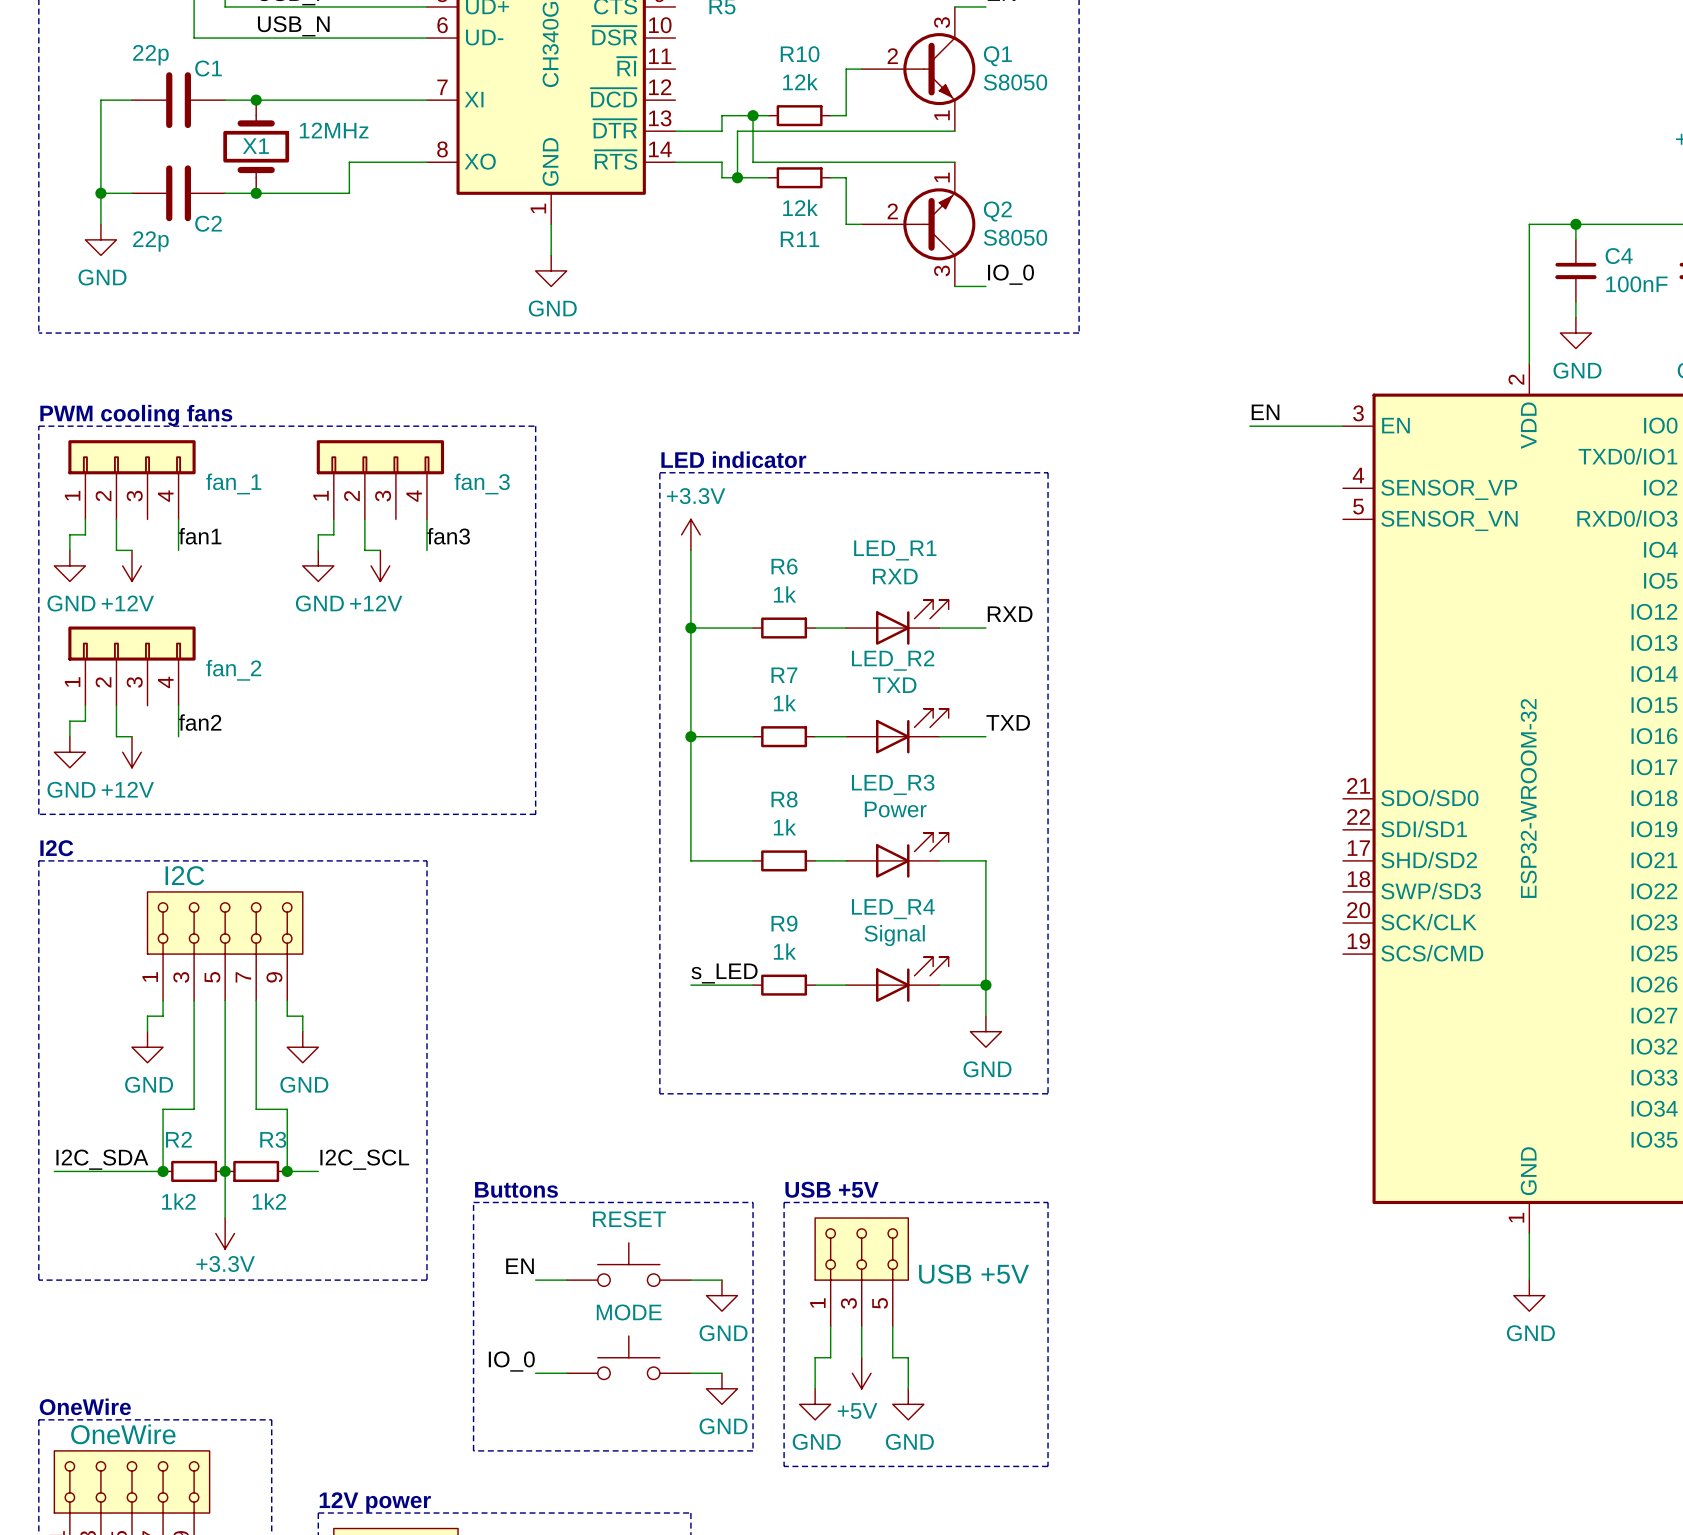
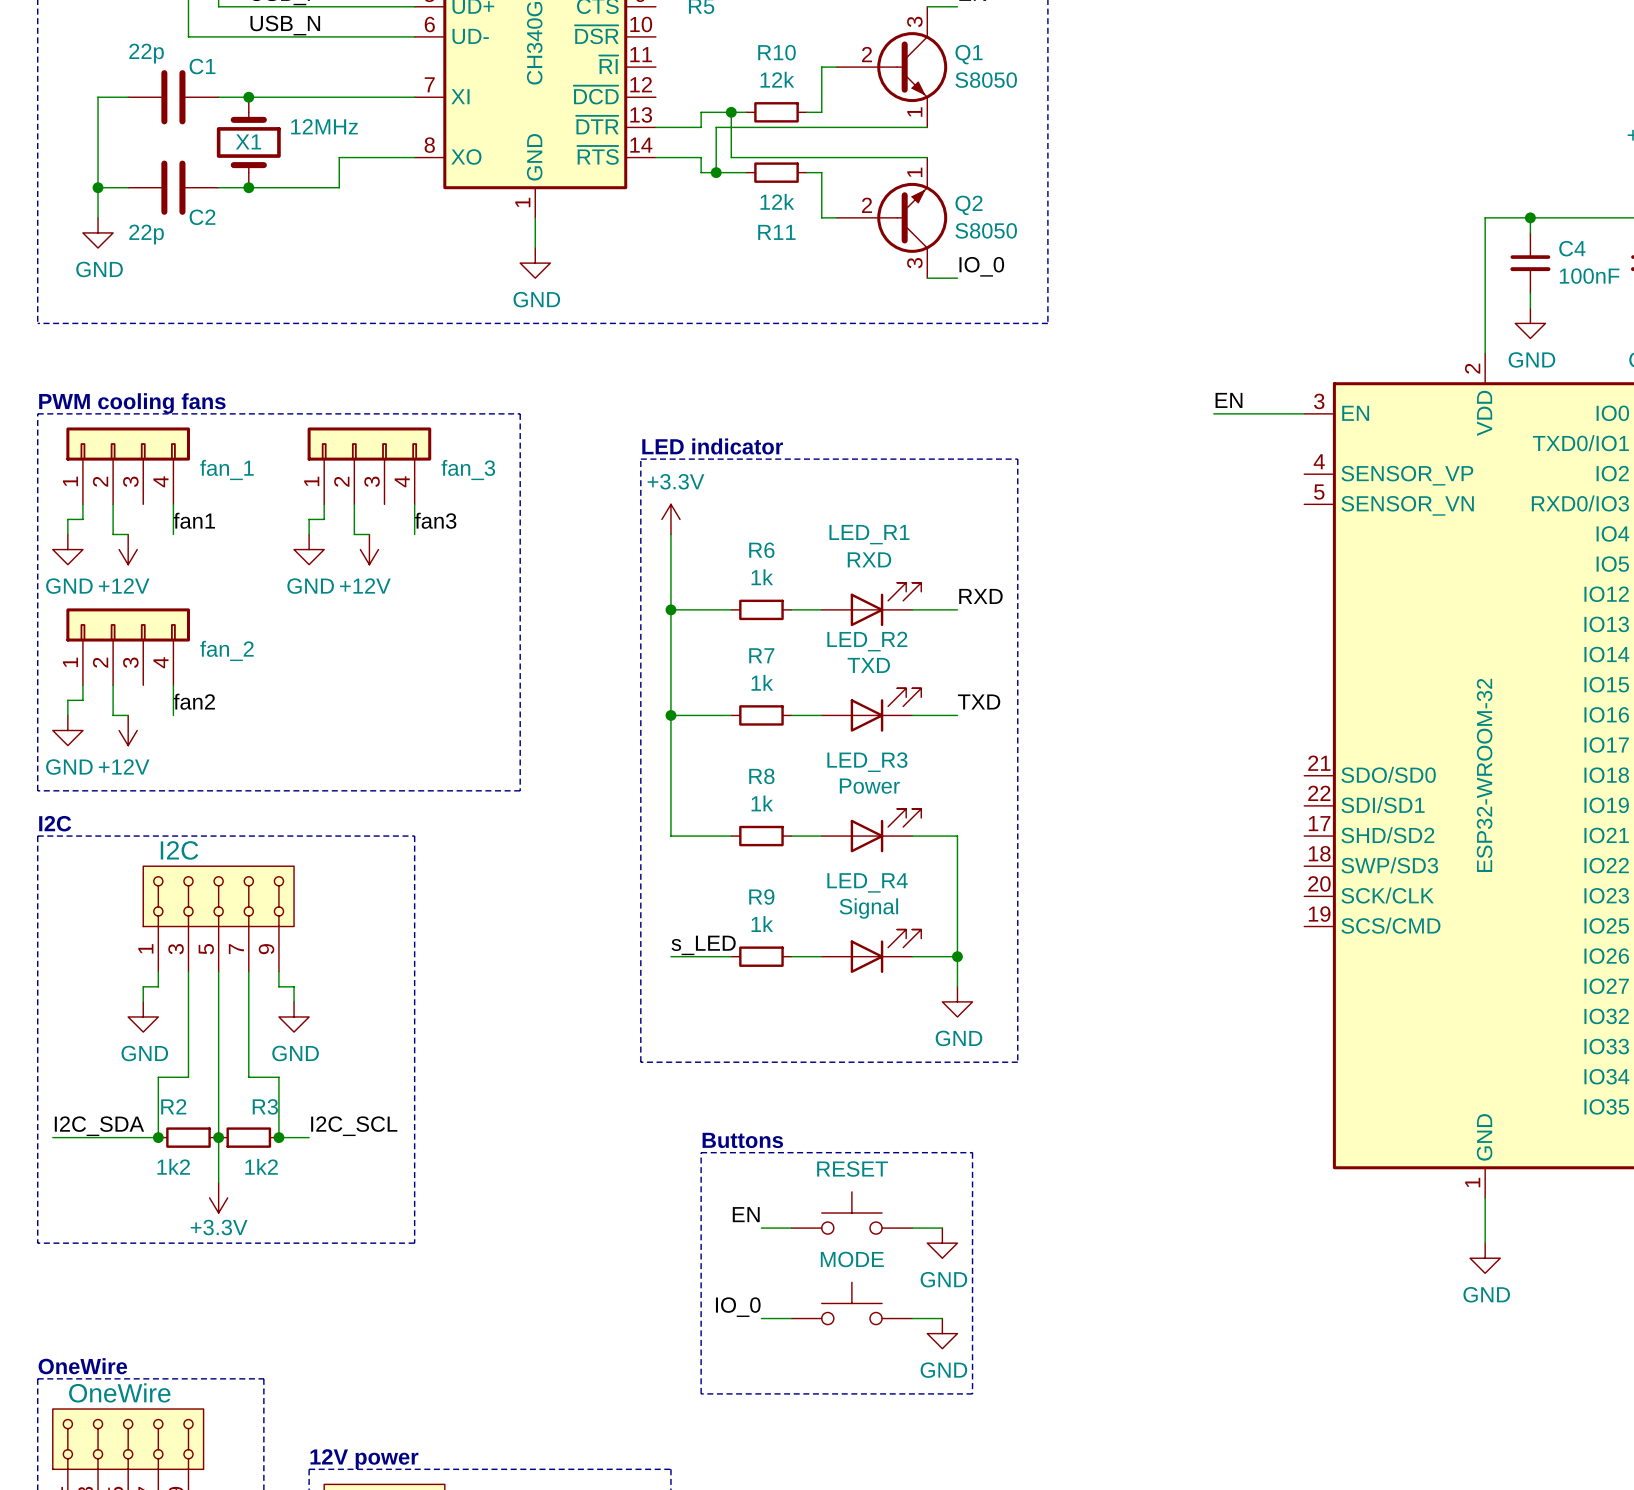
text position: Buttons (516, 1189) -> Buttons (742, 1140)
text: USB +5V (832, 1189) -> none
line: (473, 1202) (473, 1450) (753, 1450) (753, 1202) (473, 1202) -> (701, 1152) (701, 1393) (972, 1393) (972, 1152) (701, 1152)
line: (784, 1202) (1048, 1202) (1048, 1466) (784, 1466) (784, 1202) -> none
part position: (628, 1264) -> (851, 1213)
label position: EN (519, 1266) -> EN (746, 1214)
part: USB +5V (861, 1272) -> none
wire: (535, 1280) (566, 1280) -> (761, 1228) (791, 1228)
wire: (690, 1280) (721, 1280) -> (912, 1228) (942, 1228)
power symbol: none -> GND (942, 1243)
power symbol: GND (721, 1295) -> none
wire: (830, 1326) (830, 1357) (815, 1357) (815, 1388) -> none
wire: (861, 1326) (861, 1357) -> none
wire: (892, 1326) (892, 1357) (908, 1357) (908, 1388) -> none
part position: (628, 1357) -> (851, 1303)
label position: IO_0 (511, 1361) -> IO_0 (738, 1307)
wire: (535, 1373) (566, 1373) -> (761, 1318) (791, 1318)
wire: (690, 1373) (721, 1373) -> (912, 1318) (942, 1318)
power symbol: +5V (861, 1373) -> none
power symbol: none -> GND (942, 1333)
power symbol: GND (721, 1388) -> none
power symbol: GND (815, 1404) -> none
power symbol: GND (908, 1404) -> none

